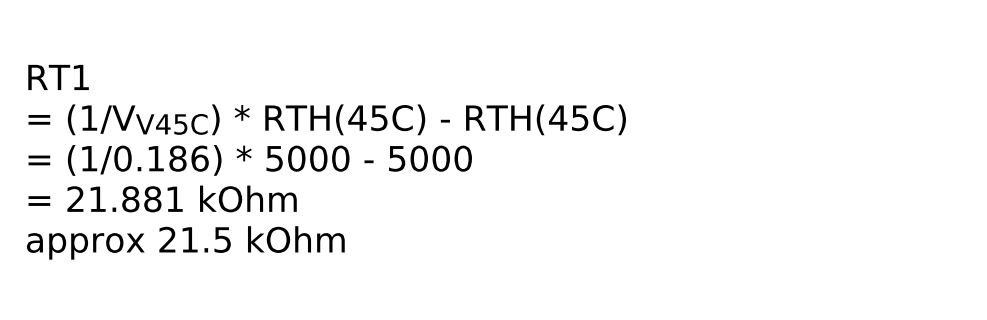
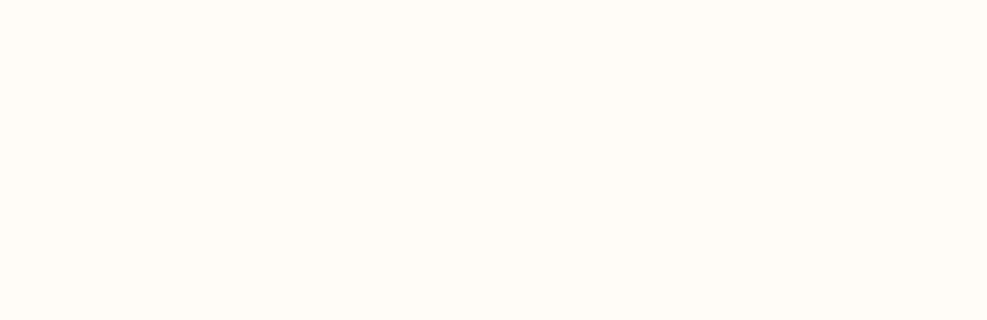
text: RT1 (58, 77) -> none
text: = (1/VV45C) * RTH(45C) - RTH(45C) (327, 119) -> none
text: = (1/0.186) * 5000 - 5000 (250, 160) -> none
text: = 21.881 kOhm (162, 198) -> none
text: approx 21.5 kOhm (185, 242) -> none

